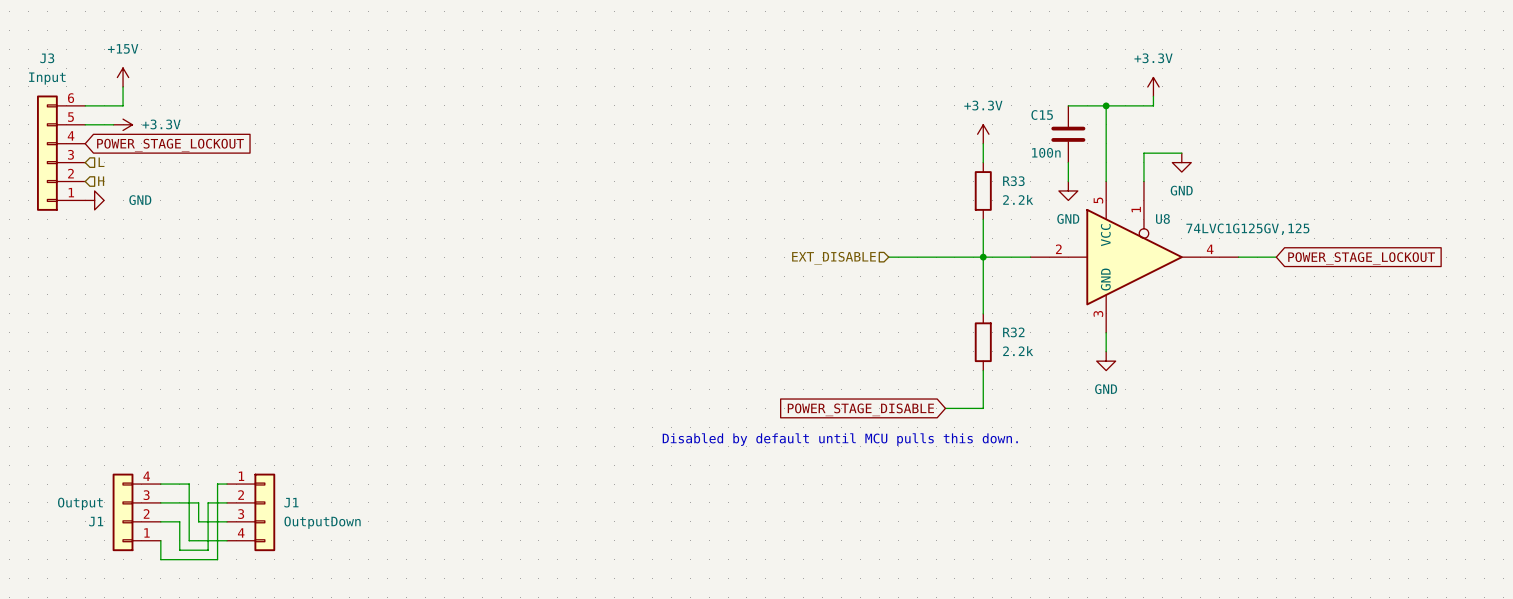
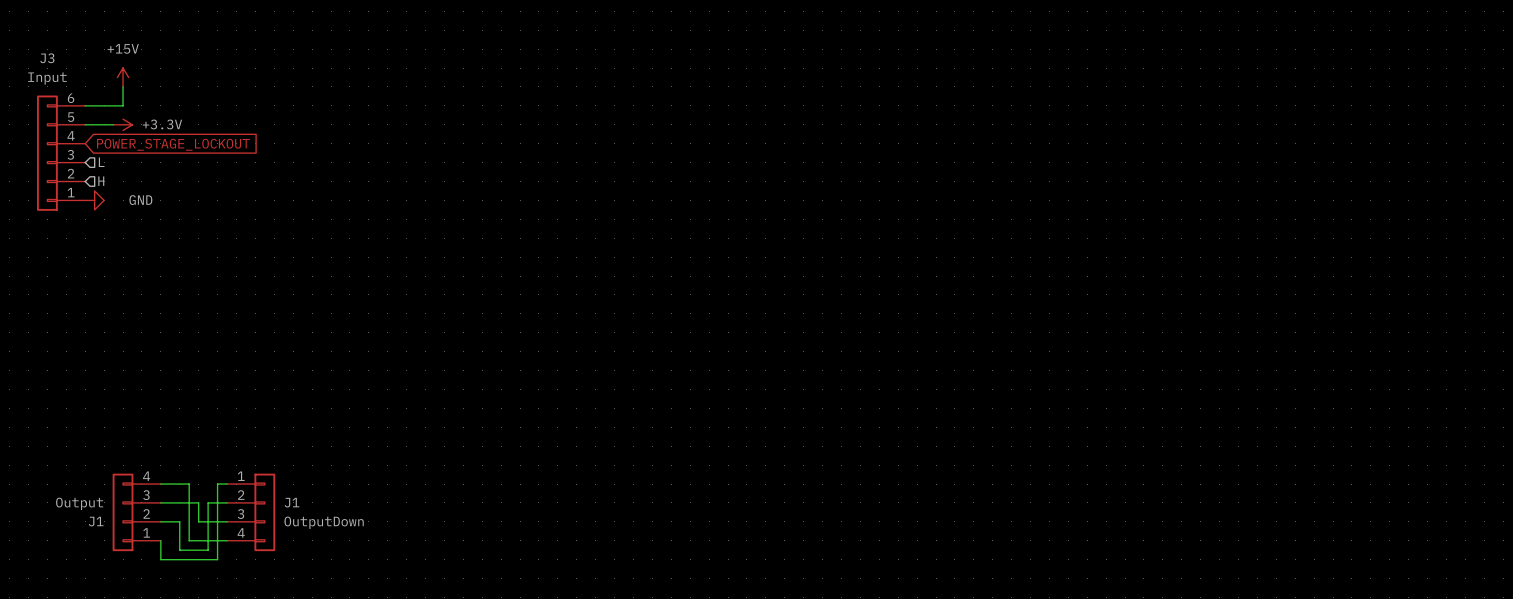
power symbol: +3.3V (1153, 86) -> none
wire: (1153, 96) (1153, 105) (1068, 105) -> none
wire: (1106, 105) (1106, 181) -> none
junction: (1106, 105) -> none
power symbol: +3.3V (983, 134) -> none
C15: 100n (1068, 134) -> none
wire: (983, 143) (983, 162) -> none
wire: (1181, 153) (1143, 153) (1143, 181) -> none
wire: (1068, 162) (1068, 181) -> none
power symbol: GND (1181, 162) -> none
R33: 2.2k (983, 190) -> none
power symbol: GND (1068, 190) -> none
wire: (983, 219) (983, 313) -> none
wire: (888, 257) (1030, 257) -> none
junction: (983, 257) -> none
U8: 74LVC1G125GV,125 (1134, 257) -> none
wire: (1238, 257) (1276, 257) -> none
hierarchical label: EXT_DISABLE (834, 258) -> none
global label: POWER_STAGE_LOCKOUT (1361, 258) -> none
wire: (1106, 332) (1106, 351) -> none
R32: 2.2k (983, 342) -> none
power symbol: GND (1106, 361) -> none
wire: (983, 370) (983, 408) (945, 408) -> none
global label: POWER_STAGE_DISABLE (860, 409) -> none
text: Disabled by default until MCU pulls this down. (840, 439) -> none

